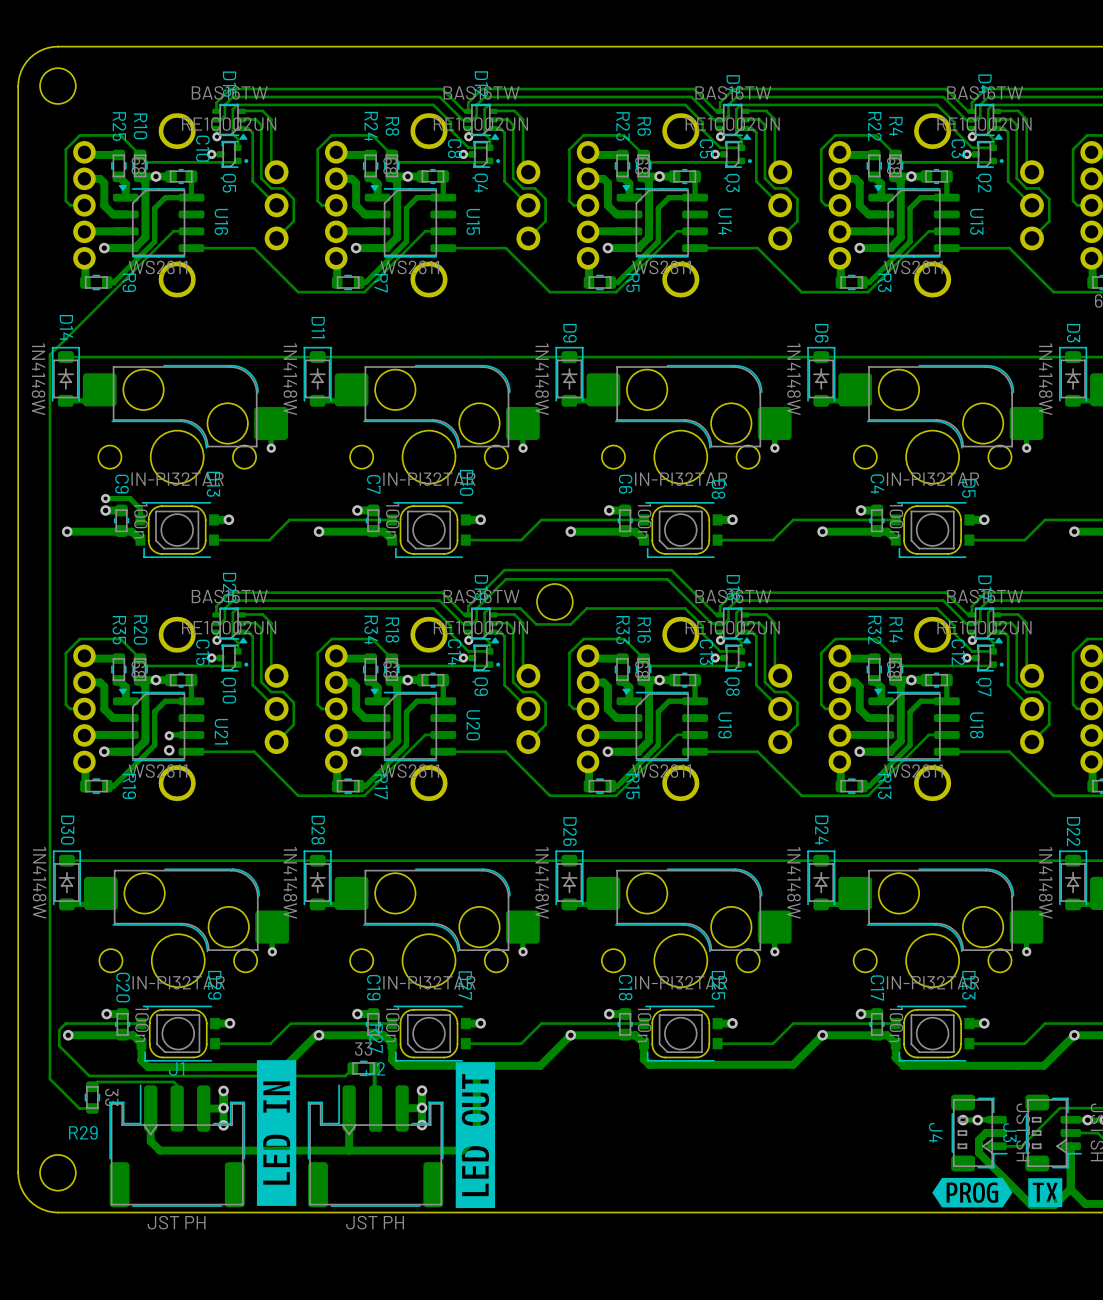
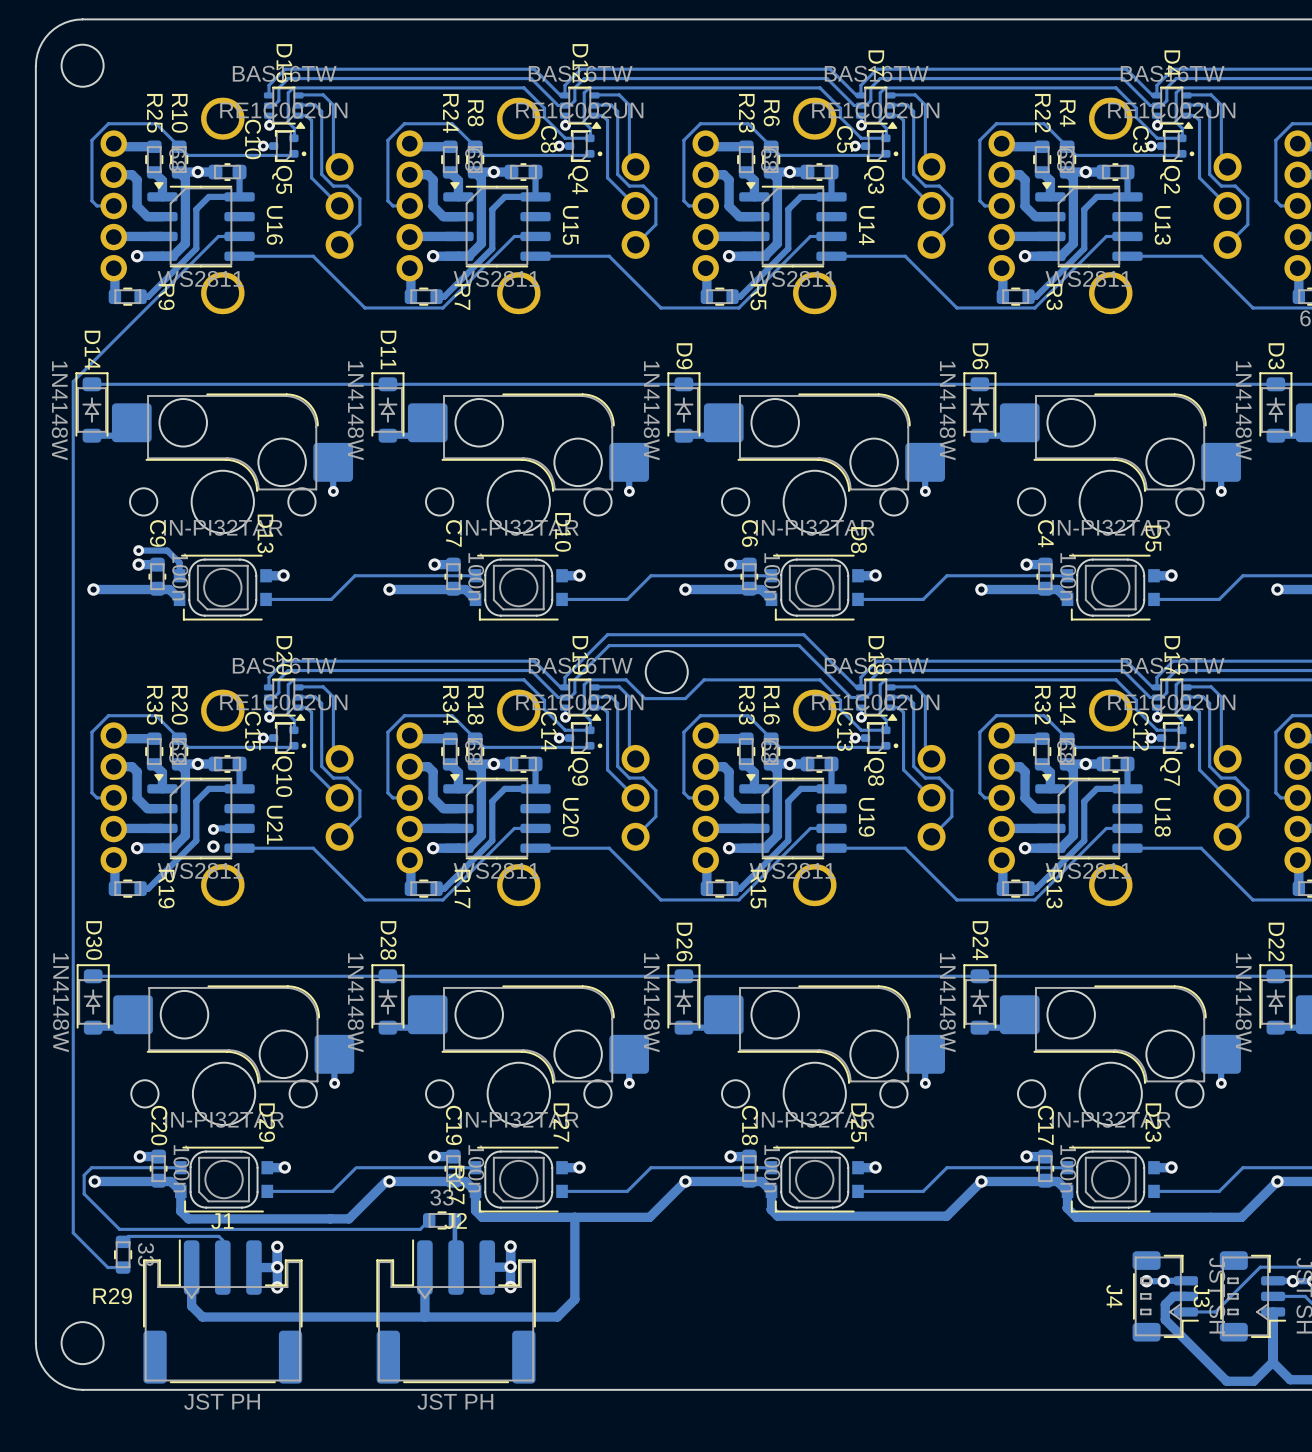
drawing: [256, 1060, 297, 1206] -> none
drawing: [455, 1062, 496, 1209] -> none
drawing: [932, 1177, 1063, 1208] -> none

